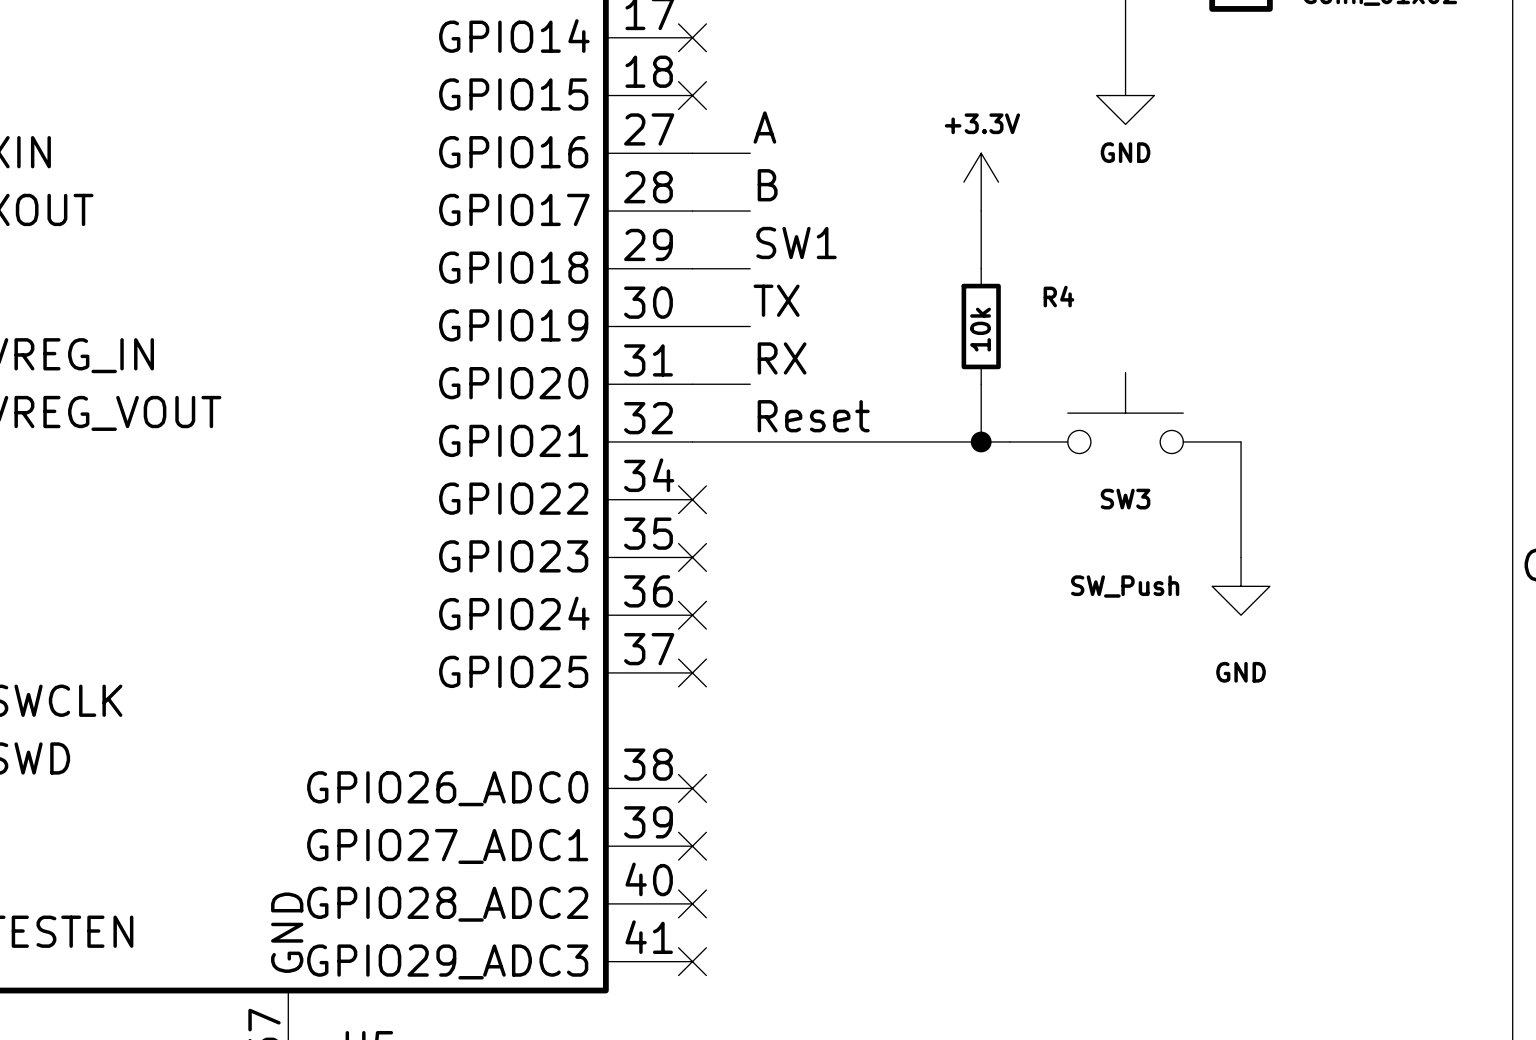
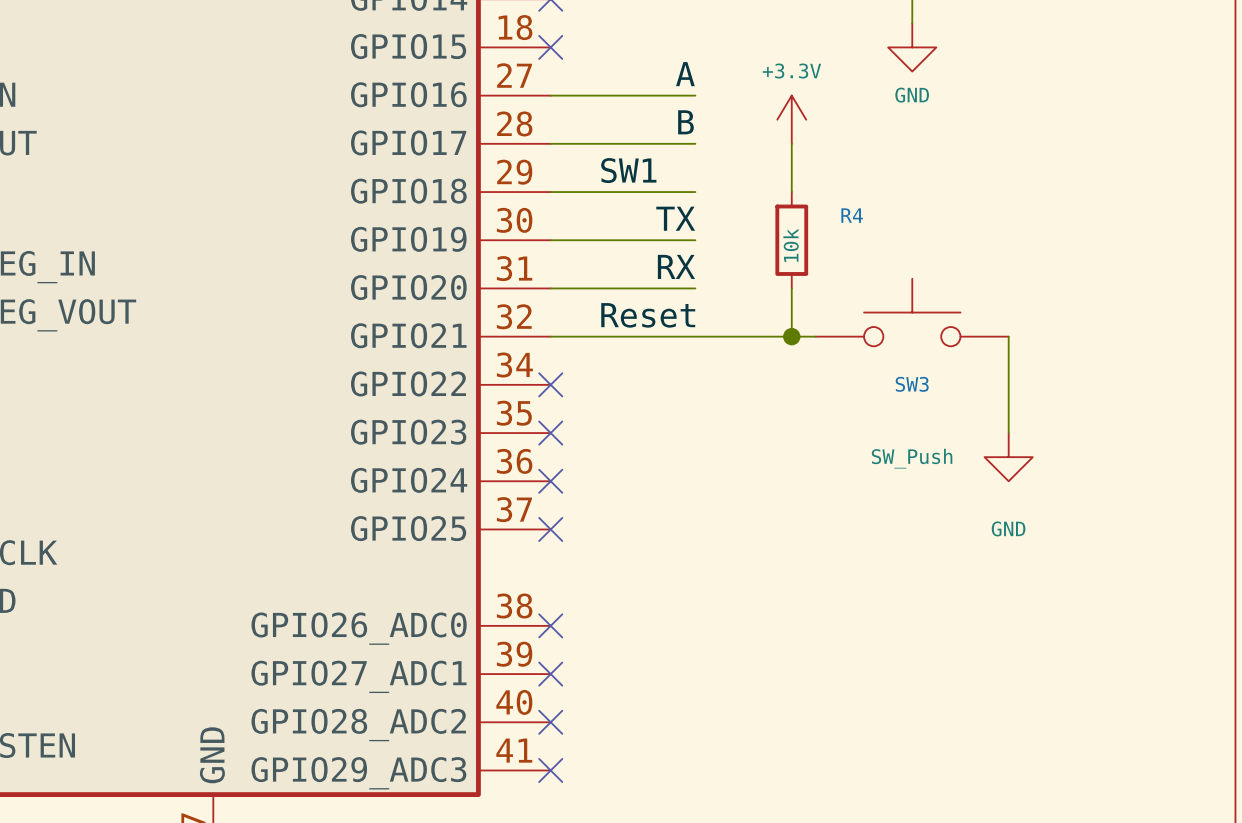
label position: A (764, 127) -> A (685, 74)
wire: none -> (598, 95) (695, 95)
label position: B (767, 185) -> B (685, 122)
wire: none -> (598, 143) (695, 143)
wire: none -> (598, 192) (695, 192)
label position: TX (776, 300) -> TX (675, 218)
wire: none -> (598, 240) (695, 240)
label position: RX (782, 358) -> RX (676, 266)
wire: none -> (598, 288) (695, 288)

